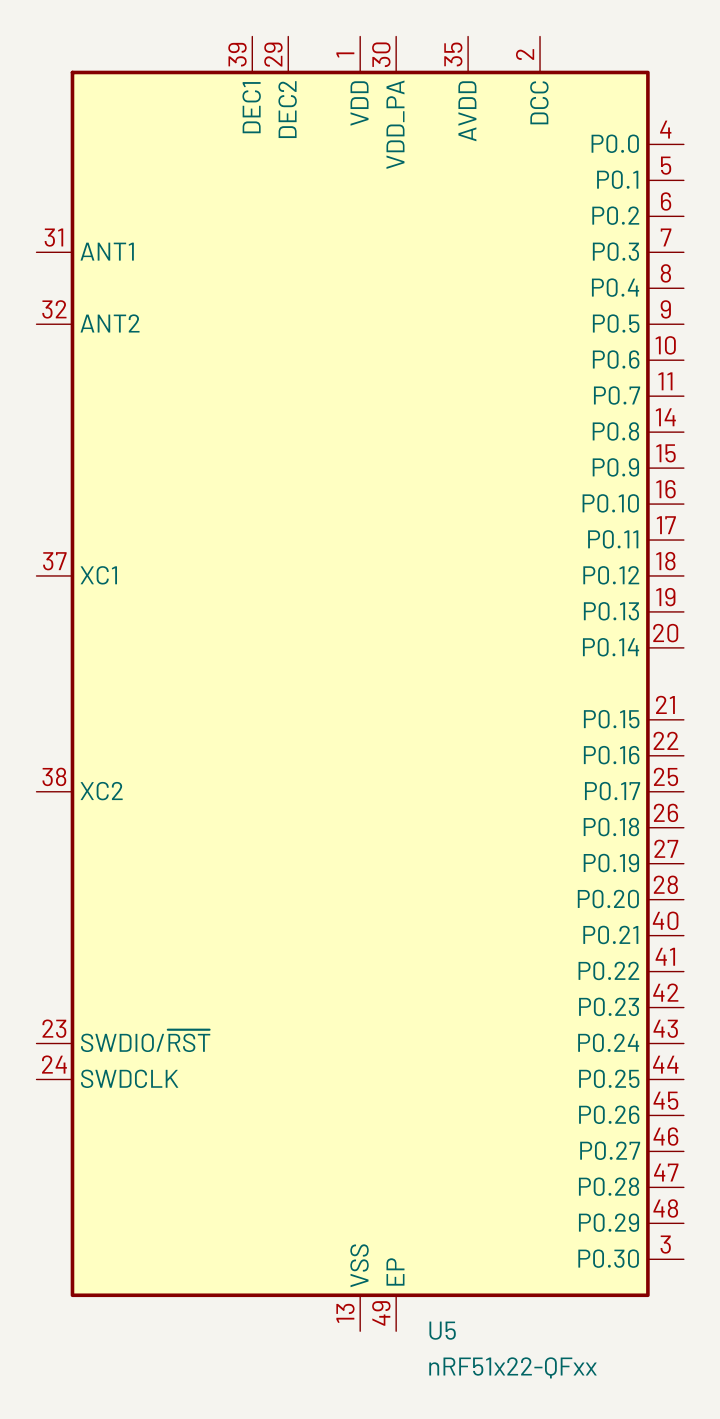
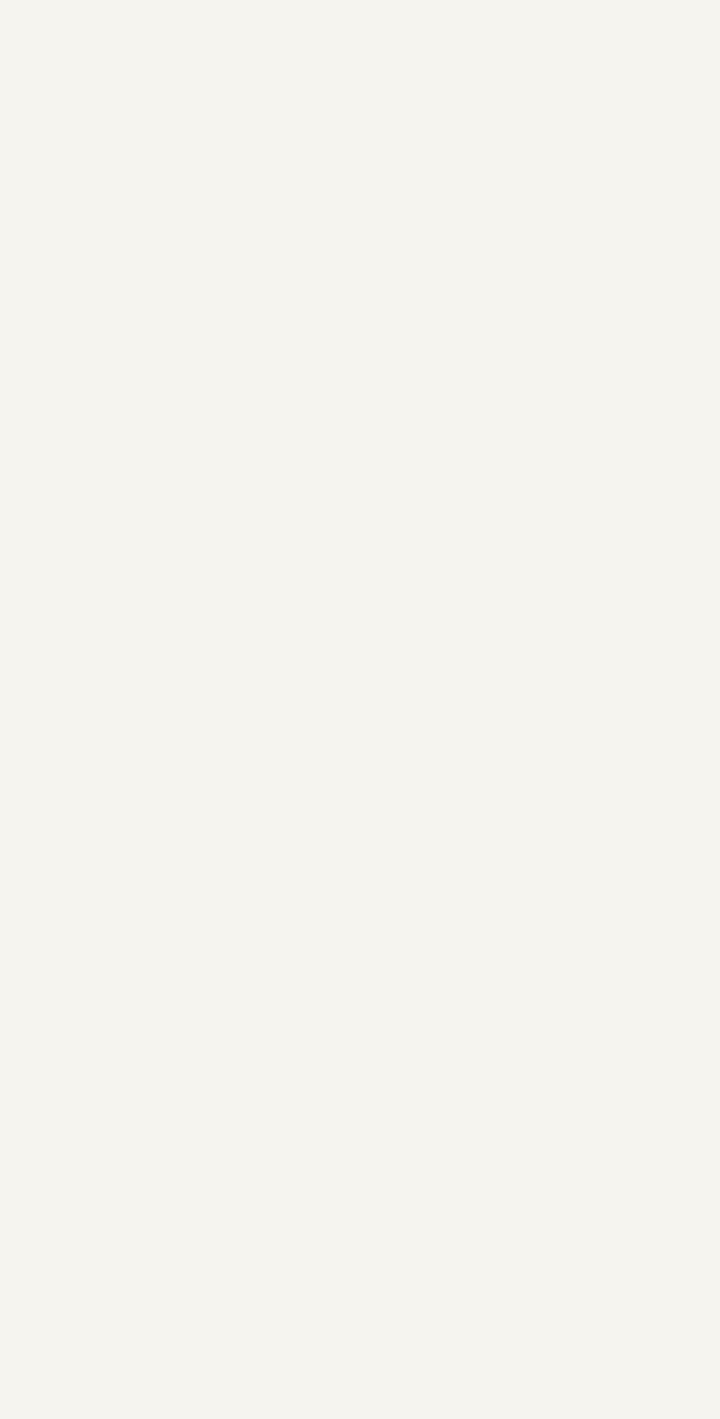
U5: nRF51x22-QFxx (360, 683) -> none

